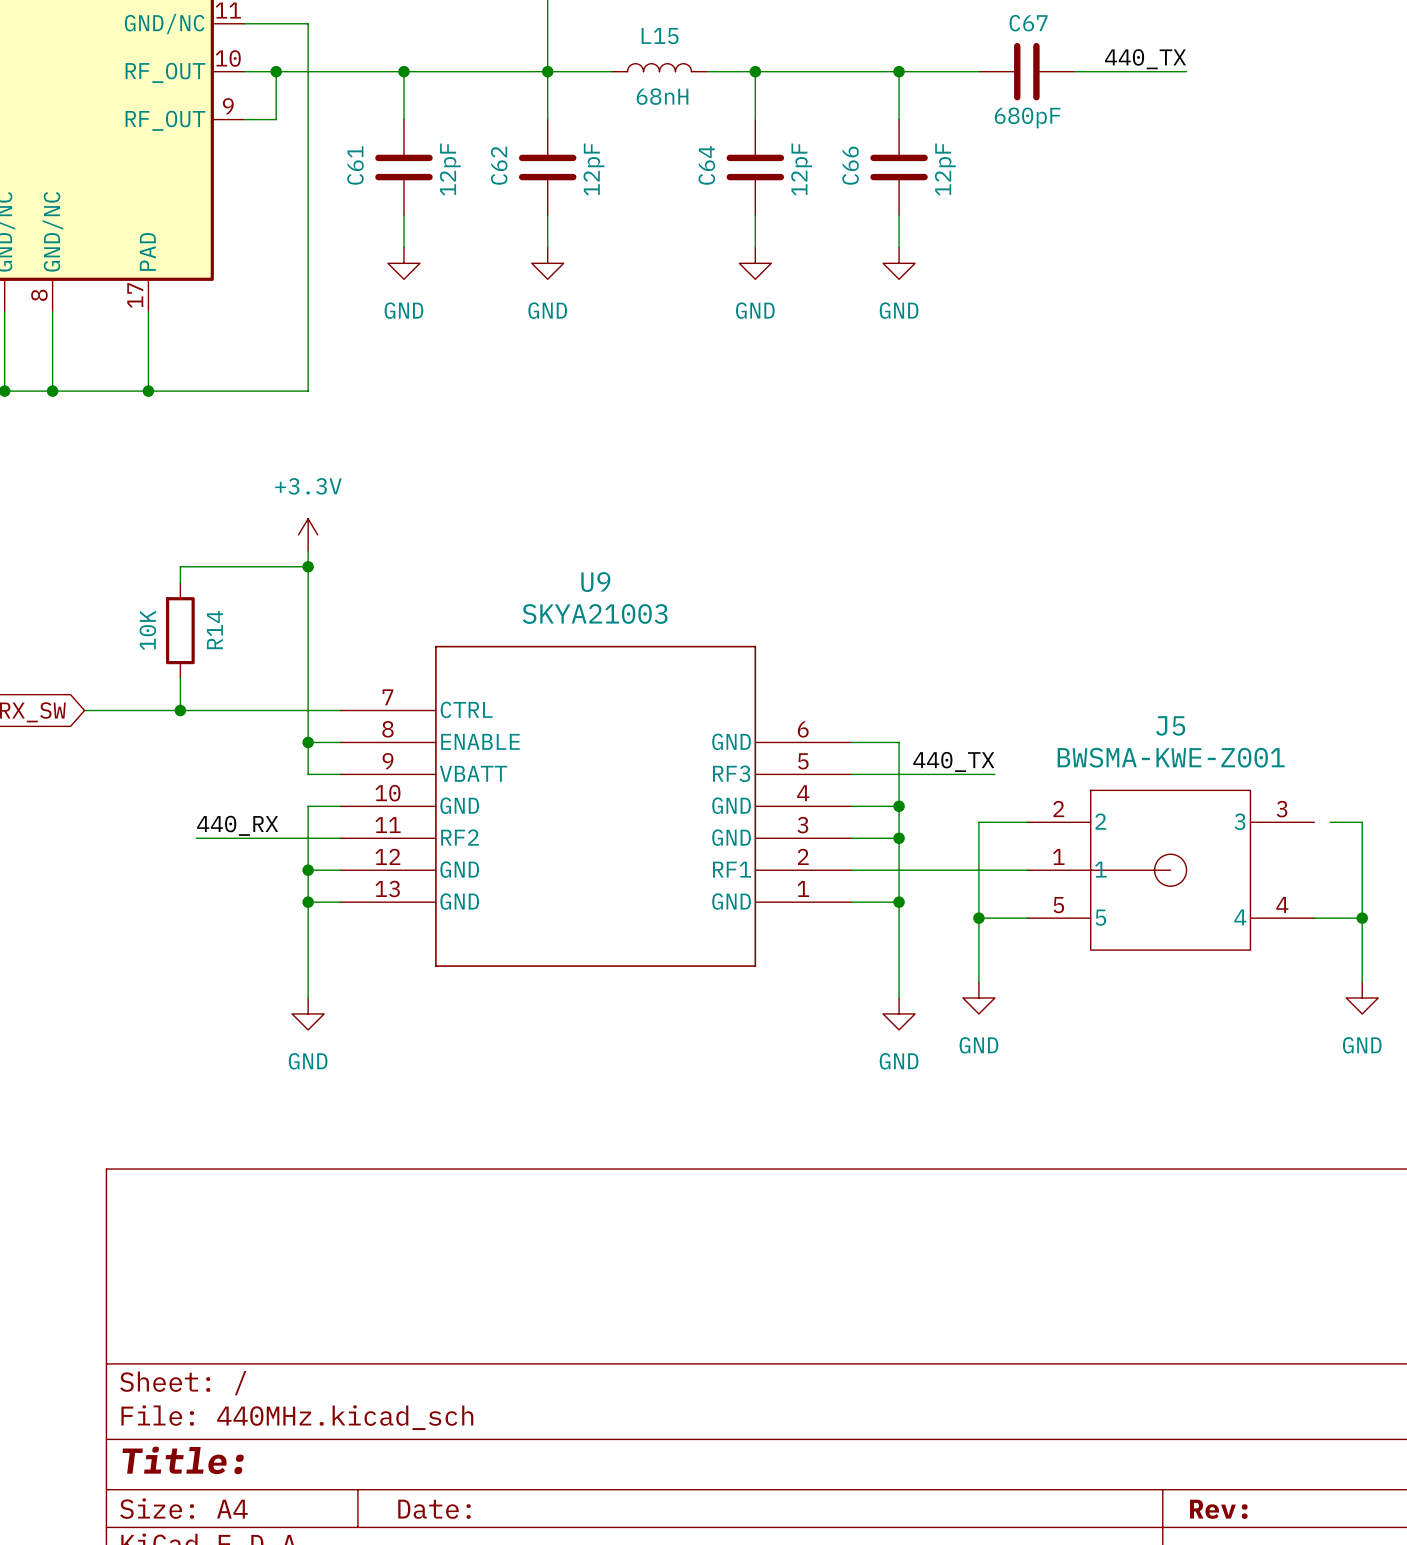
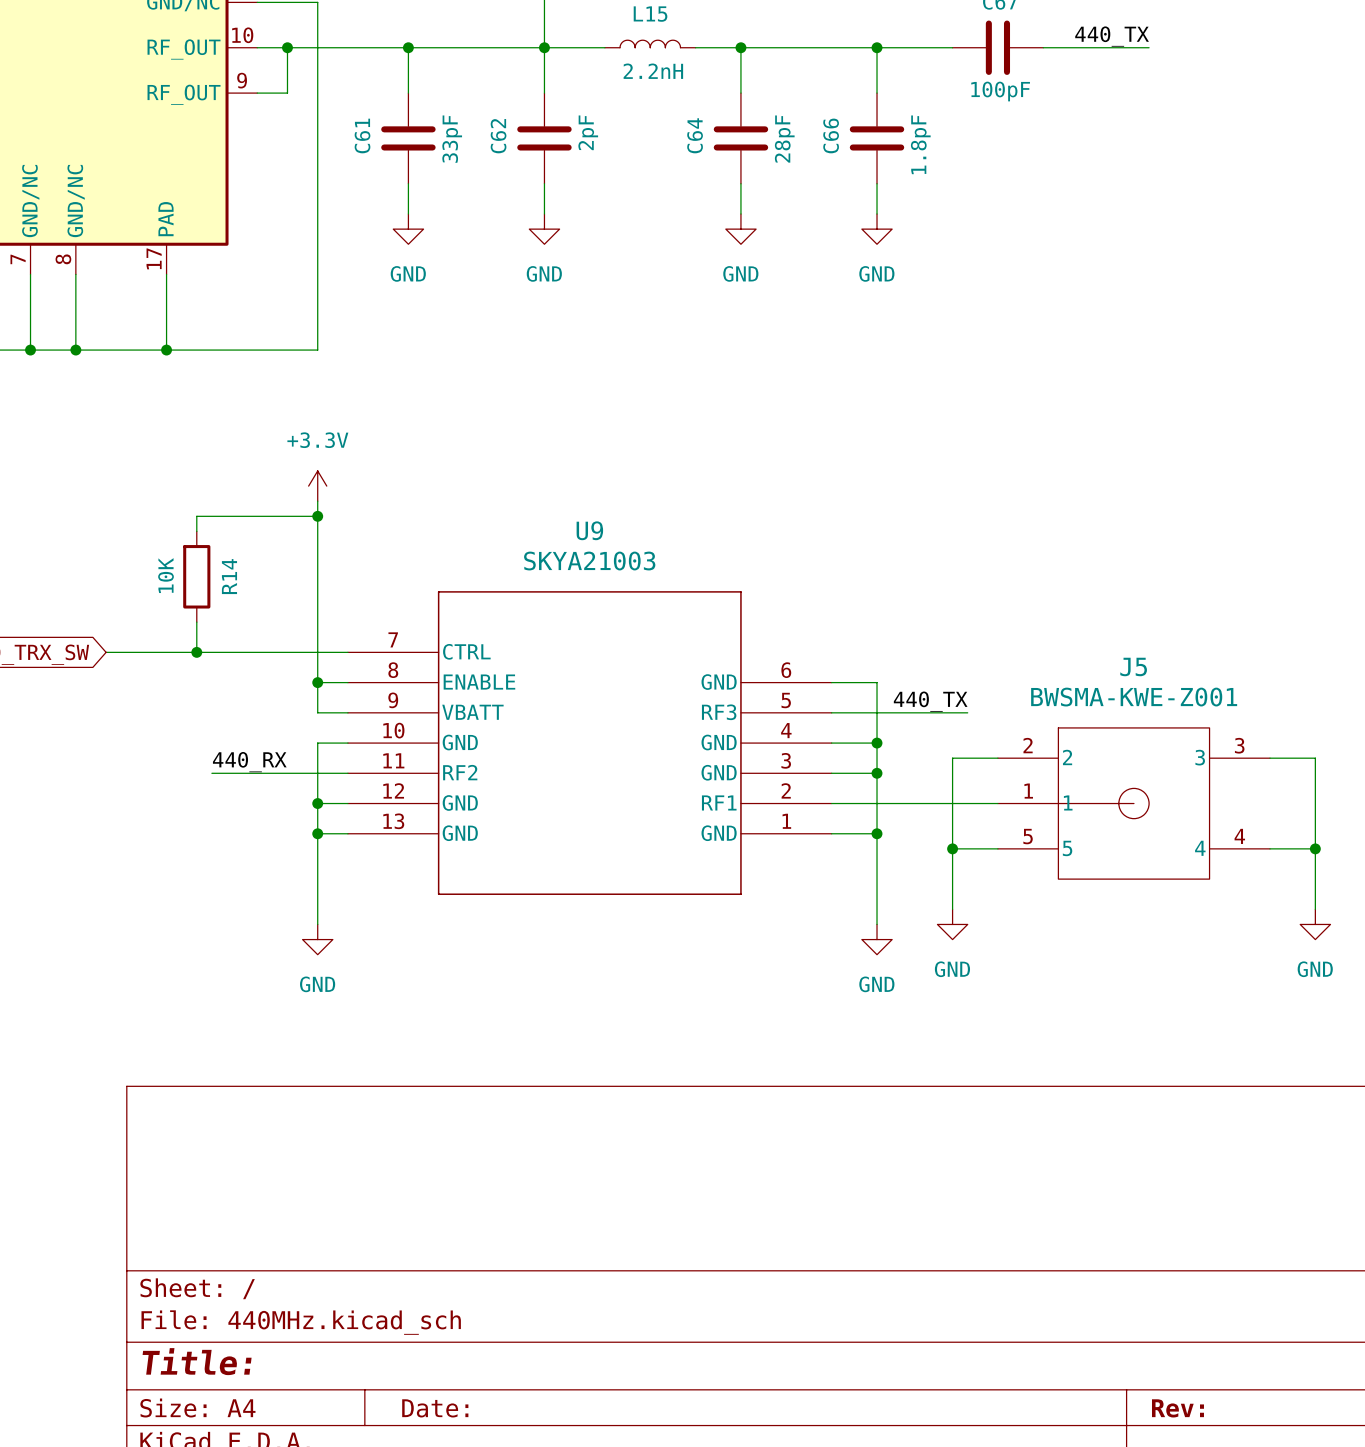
L15 value: 68nH (662, 96) -> 2.2nH (653, 71)
C67 value: 680pF (1027, 117) -> 100pF (1000, 91)
C61 value: 12pF (450, 169) -> 33pF (452, 139)
C62 value: 12pF (593, 169) -> 2pF (588, 132)
C64 value: 12pF (801, 169) -> 28pF (784, 139)
C66 value: 12pF (945, 169) -> 1.8pF (920, 144)
wire: none -> (1270, 758) (1285, 758)

